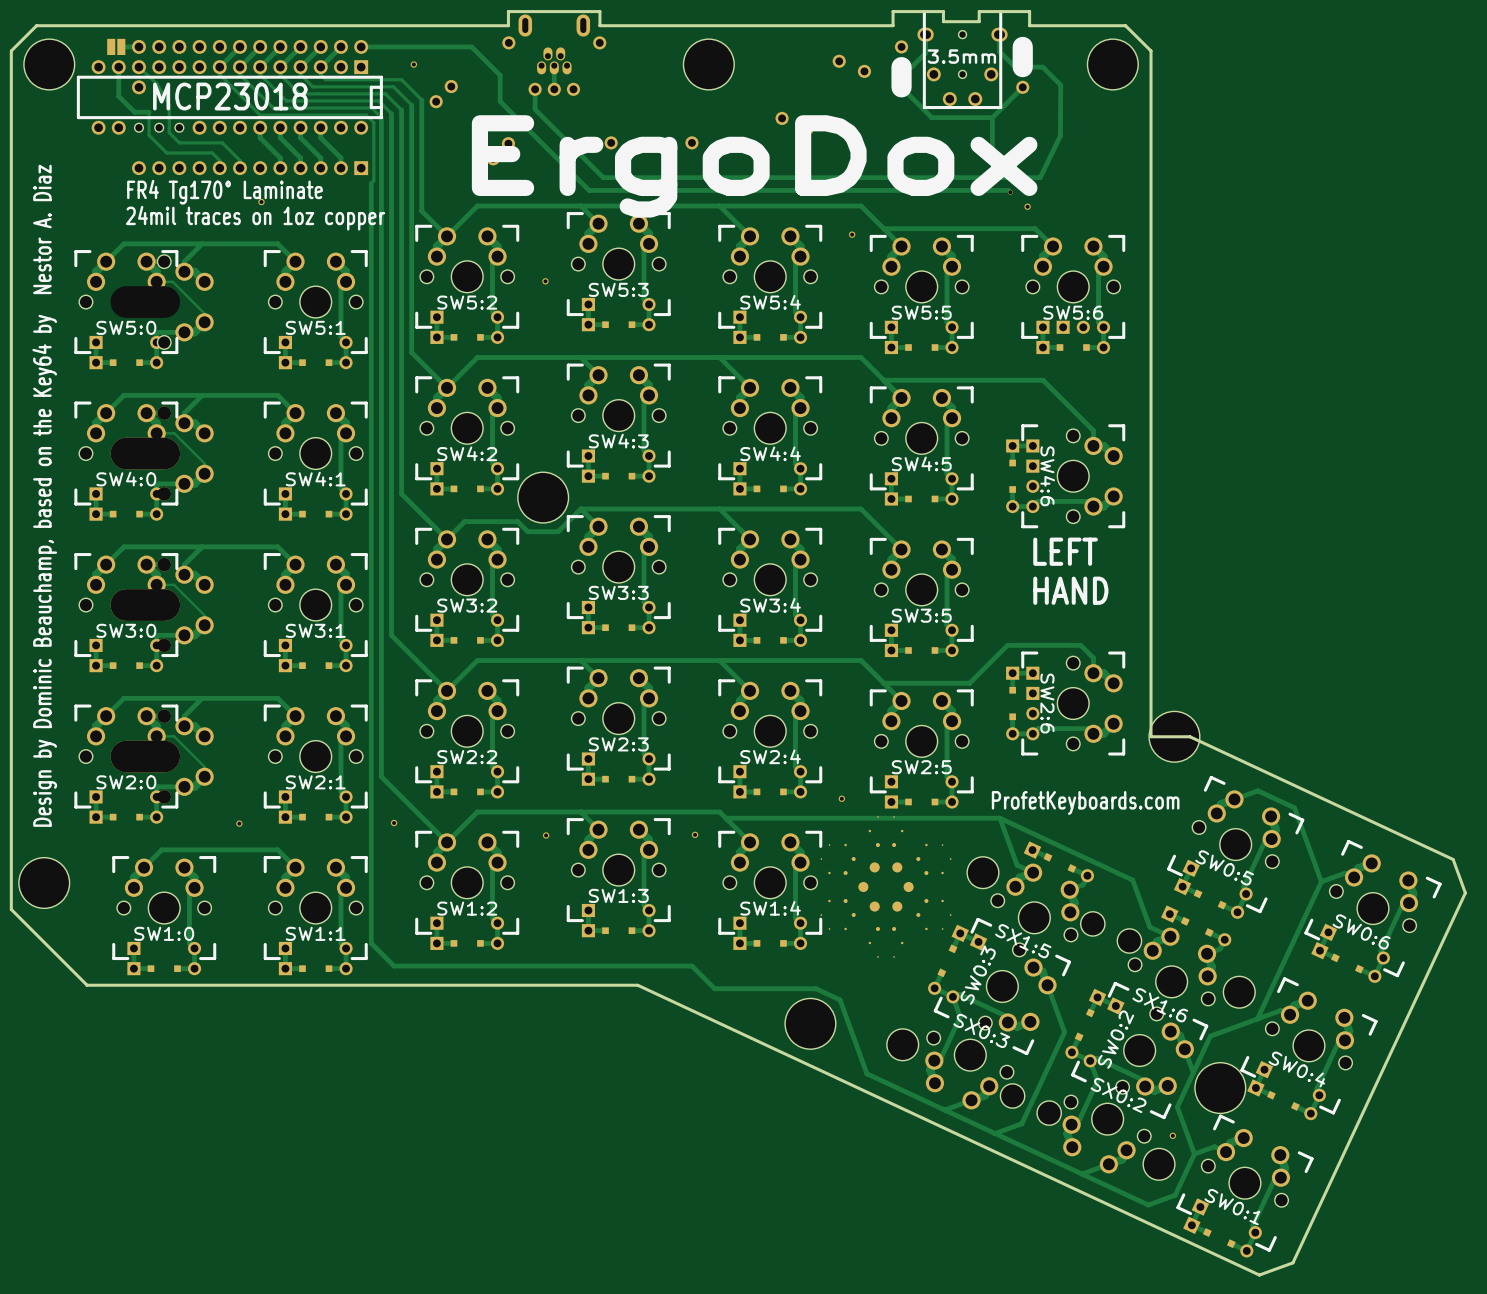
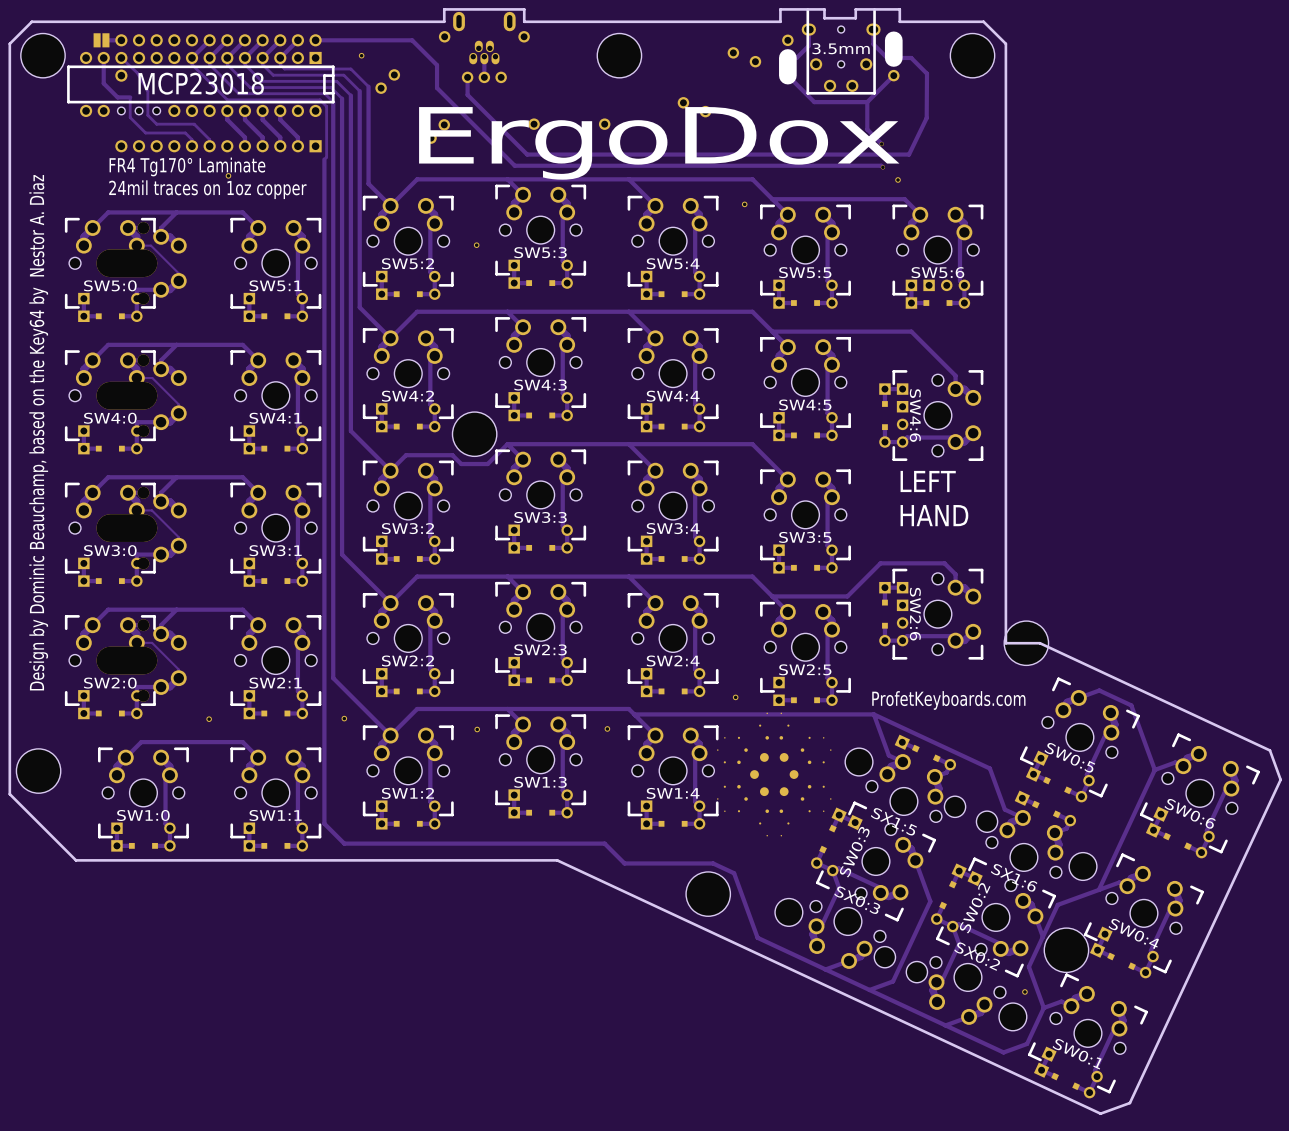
part footprint: [74, 250, 214, 370] -> [64, 217, 187, 323]

